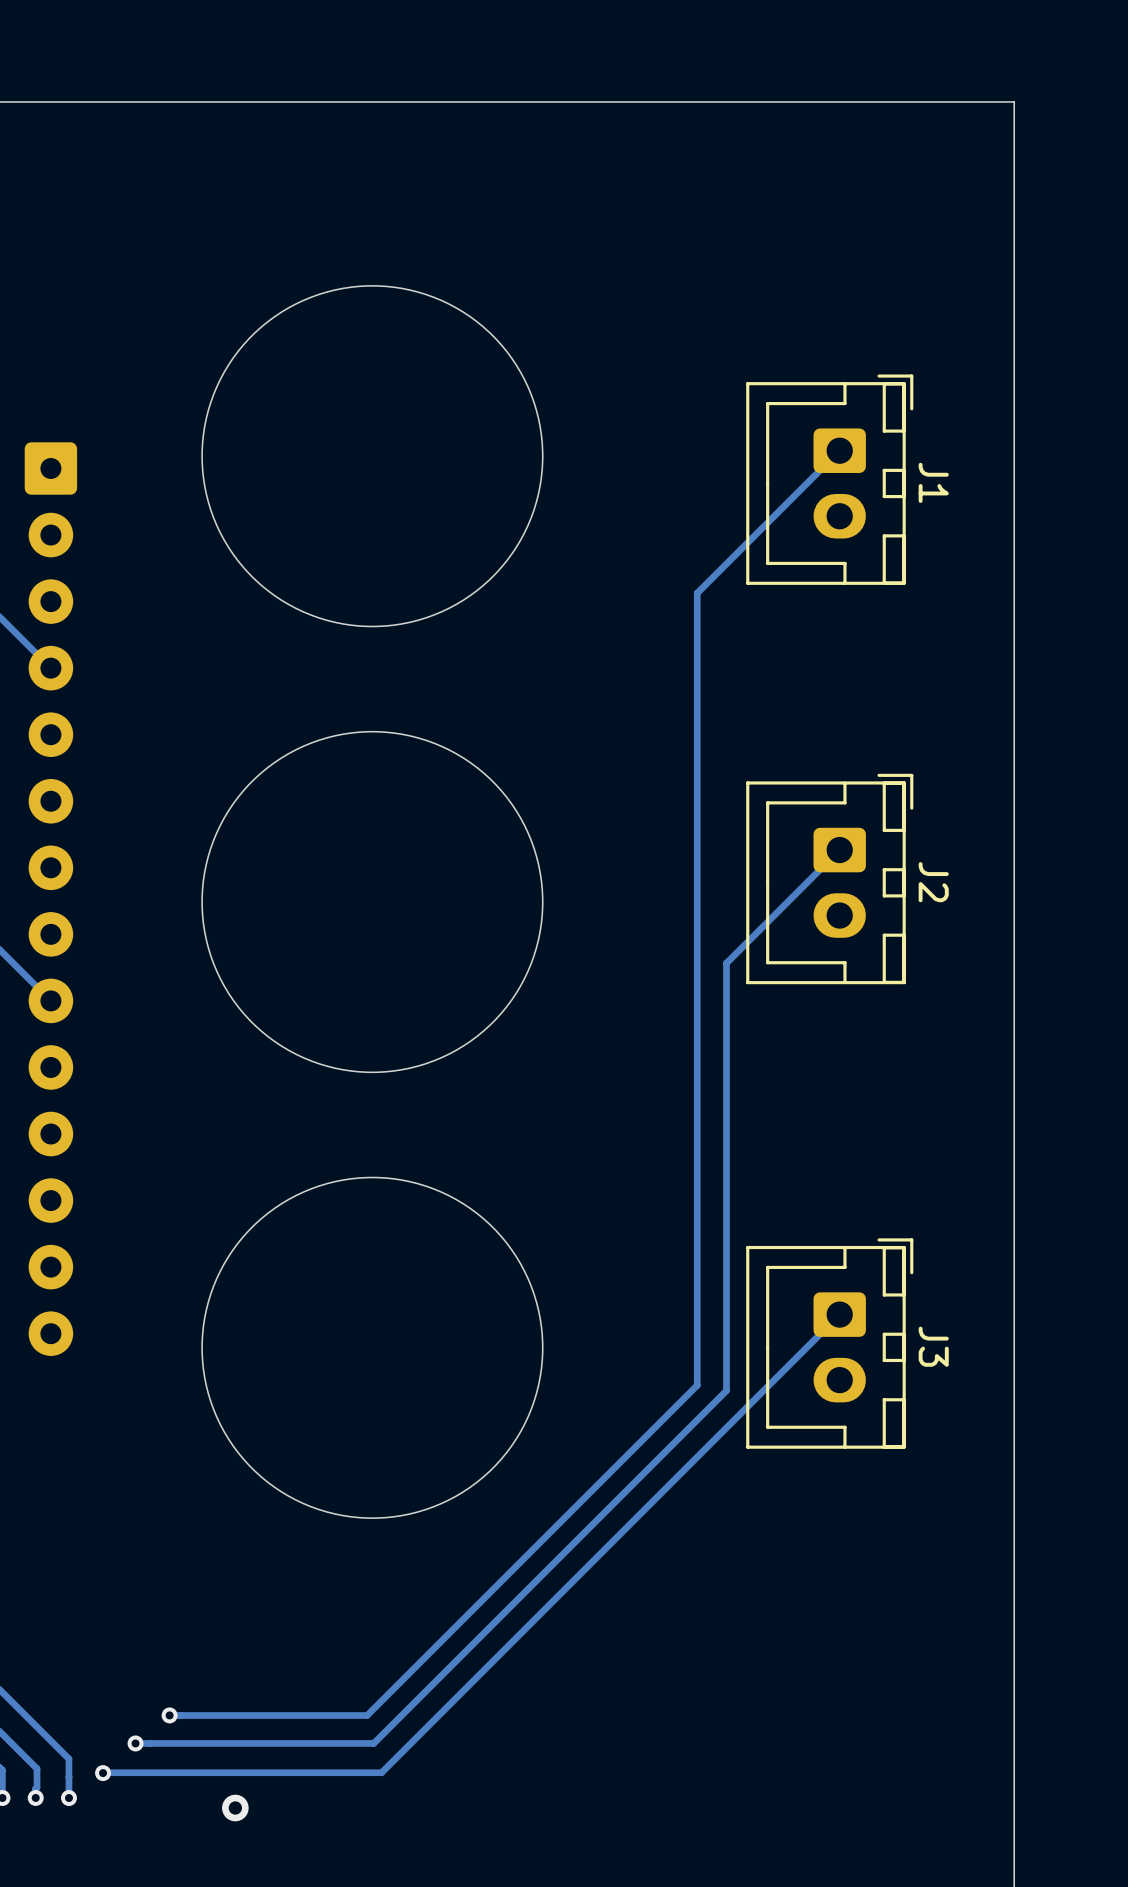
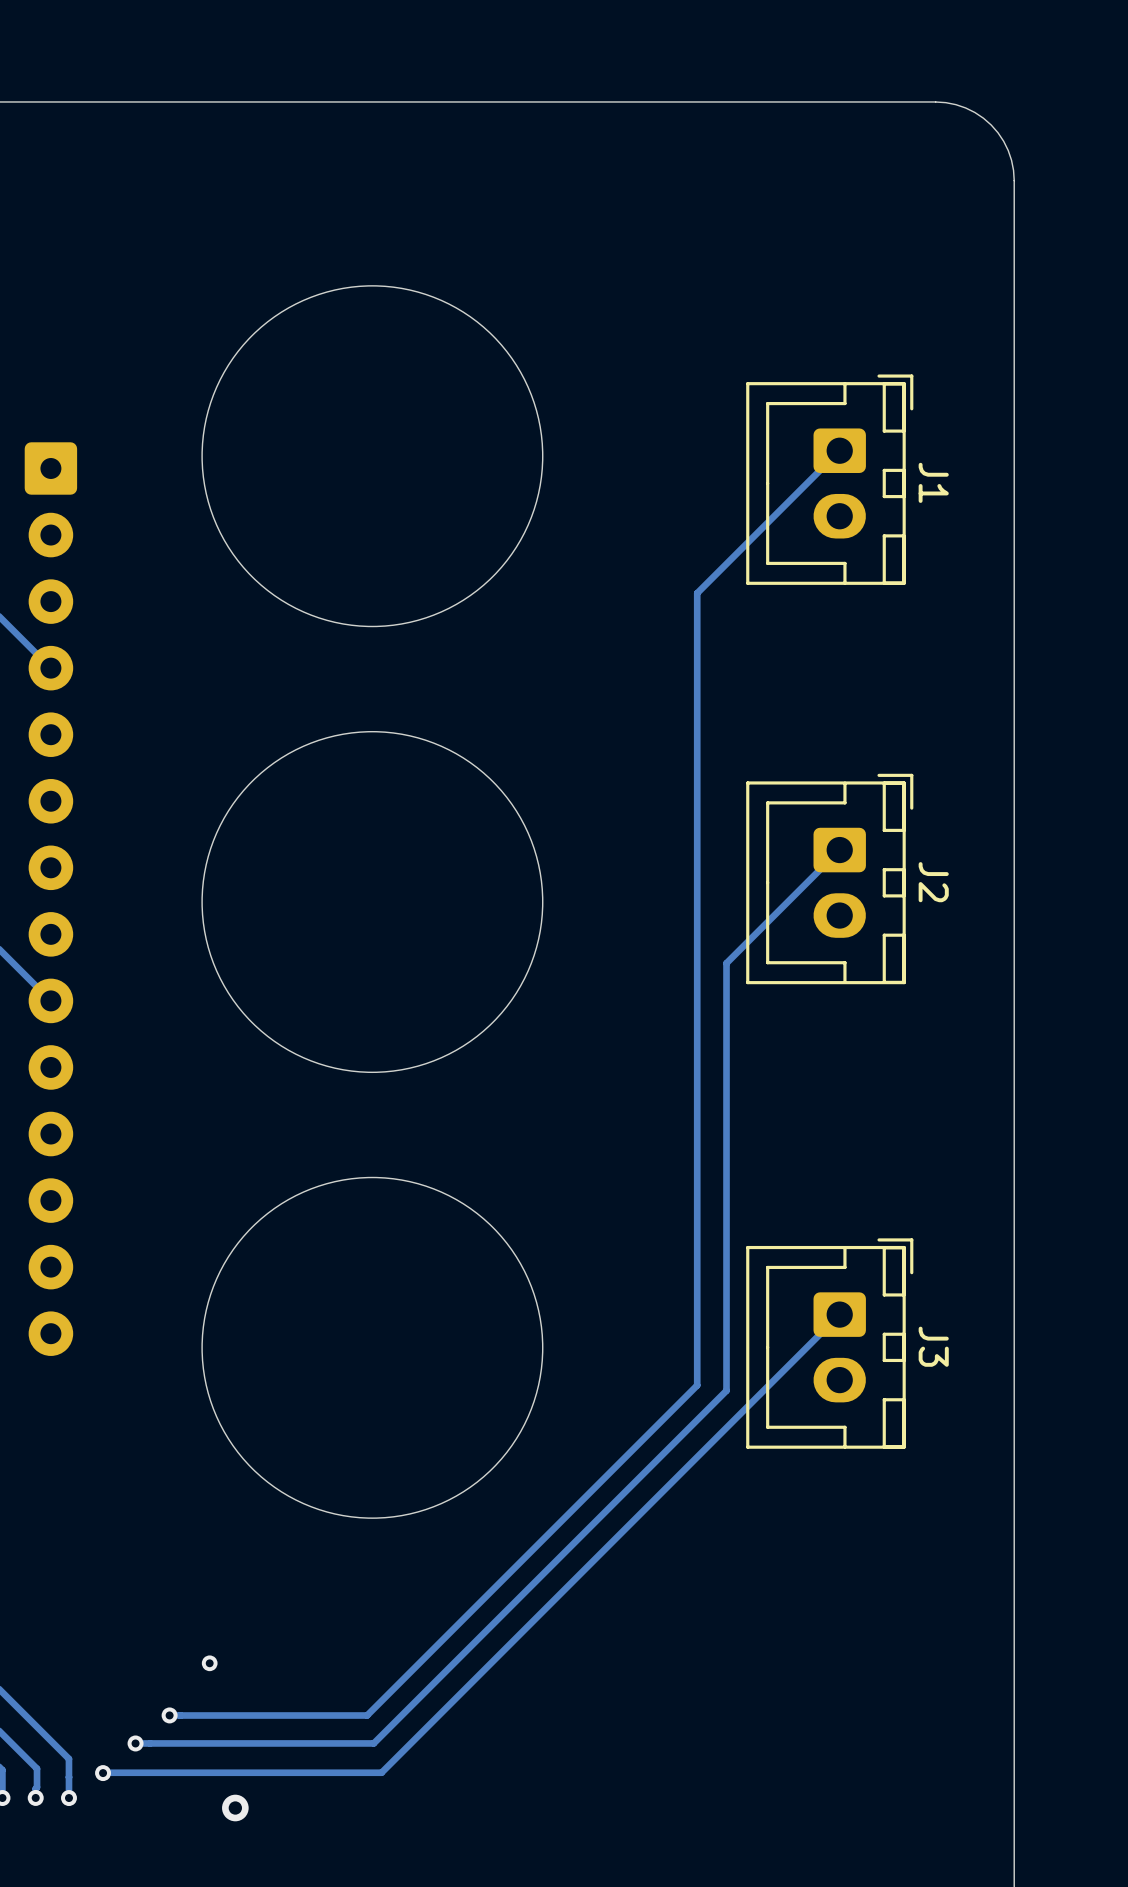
board edge: (935, 101) (1014, 101) (1014, 180) -> (935, 101) (965, 107) (991, 125) (1008, 150) (1014, 180)
via: none -> (209, 1663)

